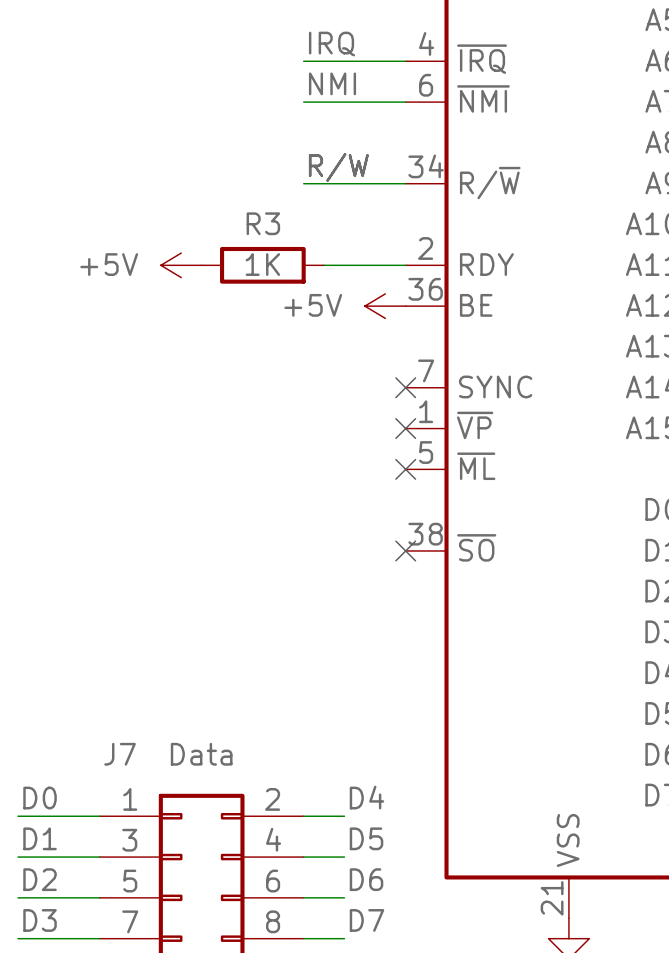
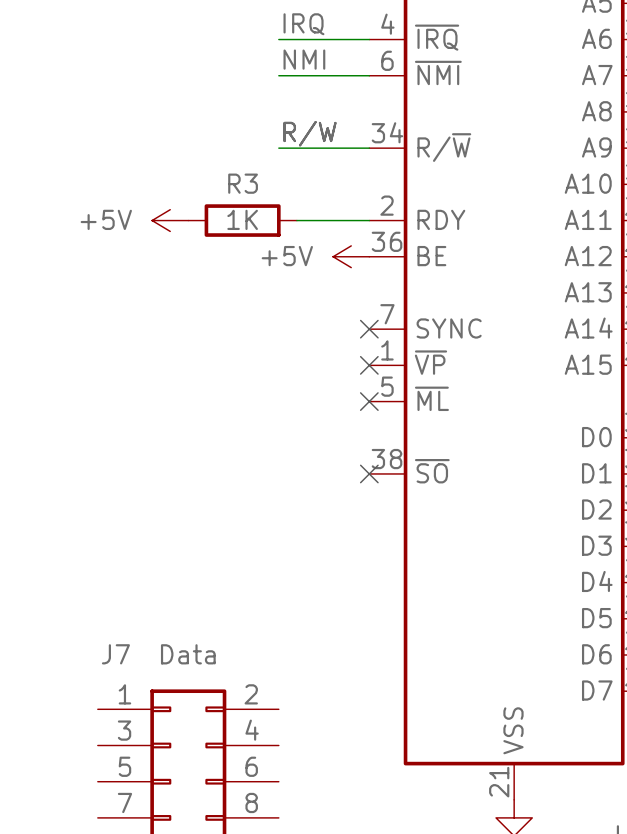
label: D4 (366, 797) -> none
label: D0 (40, 798) -> none
wire: (18, 816) (99, 816) -> none
wire: (303, 816) (344, 816) -> none
label: D1 (40, 838) -> none
label: D5 (366, 838) -> none
wire: (18, 857) (99, 857) -> none
wire: (303, 857) (344, 857) -> none
label: D2 (40, 879) -> none
label: D6 (366, 879) -> none
wire: (18, 897) (99, 897) -> none
wire: (303, 897) (344, 897) -> none
label: D3 (40, 920) -> none
label: D7 (366, 920) -> none
wire: (18, 938) (99, 938) -> none
wire: (303, 938) (344, 938) -> none

